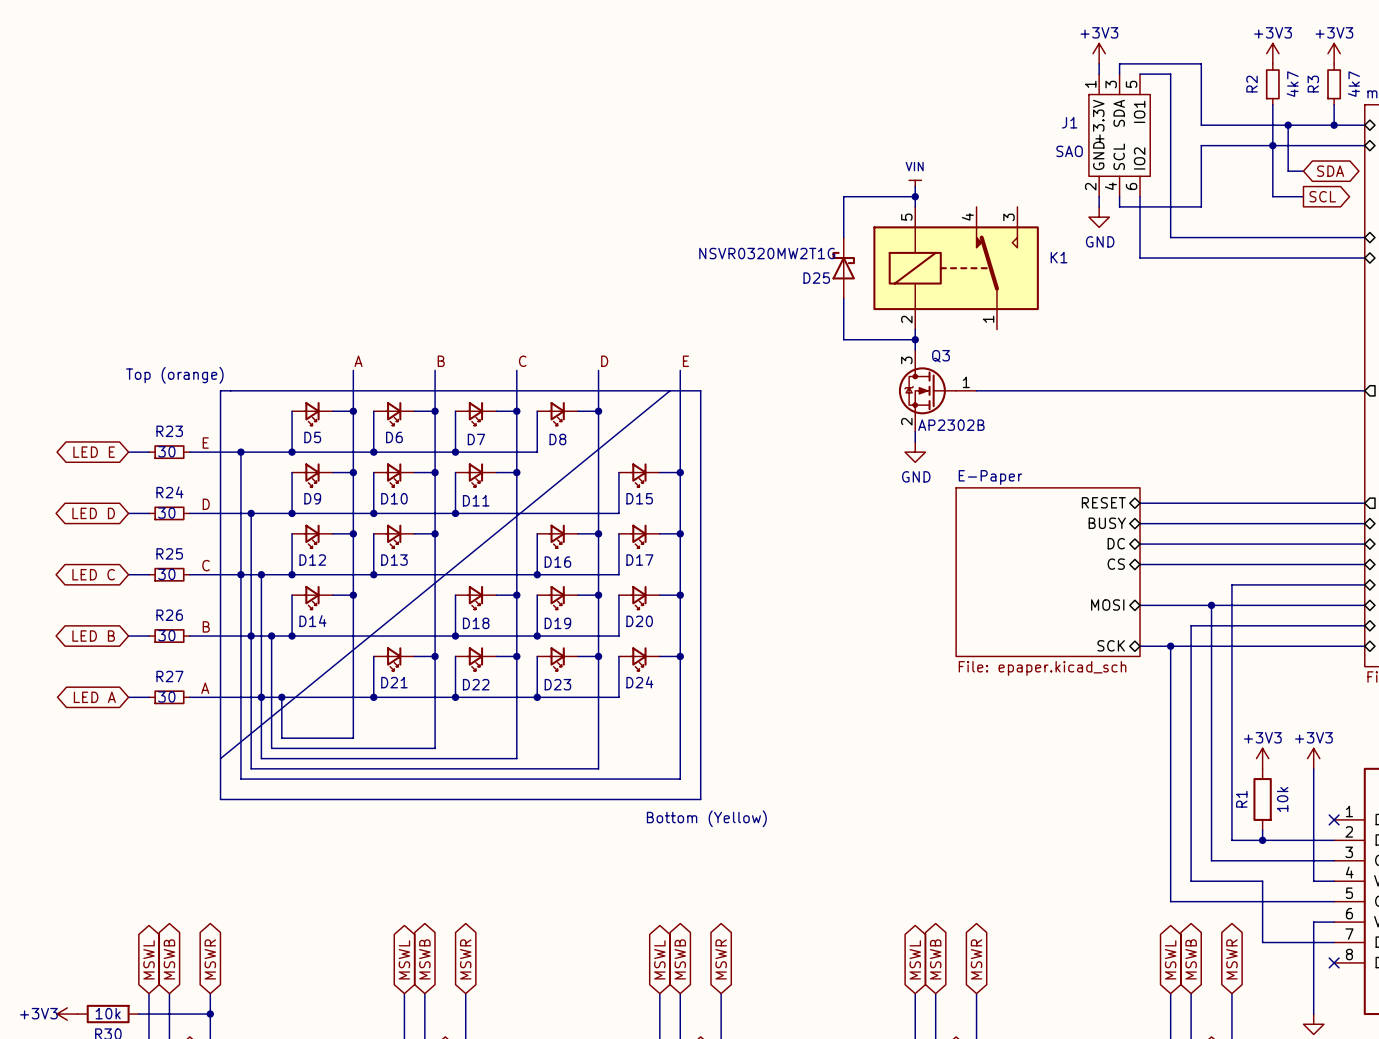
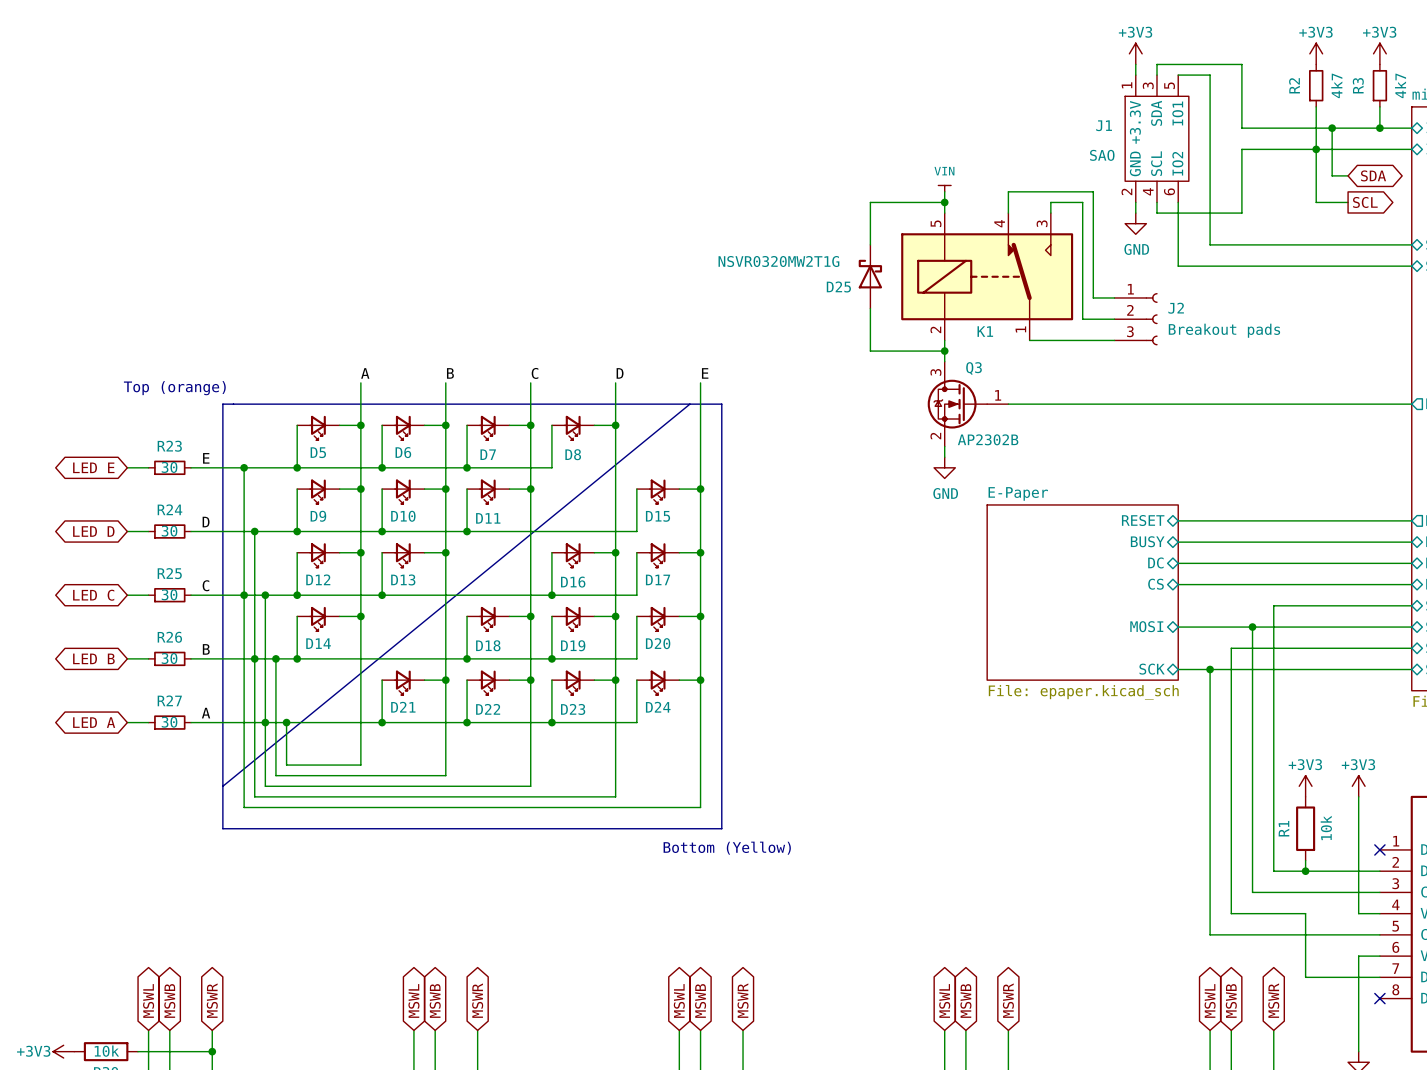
wire: none -> (1008, 213) (1008, 191) (1093, 191) (1093, 297) (1114, 297)
wire: none -> (1050, 213) (1050, 202) (1082, 202) (1082, 319) (1114, 319)
K1 name position: K1 (1059, 257) -> K1 (985, 331)
J2: none -> Breakout pads (1136, 319)
wire: none -> (1029, 340) (1114, 340)

